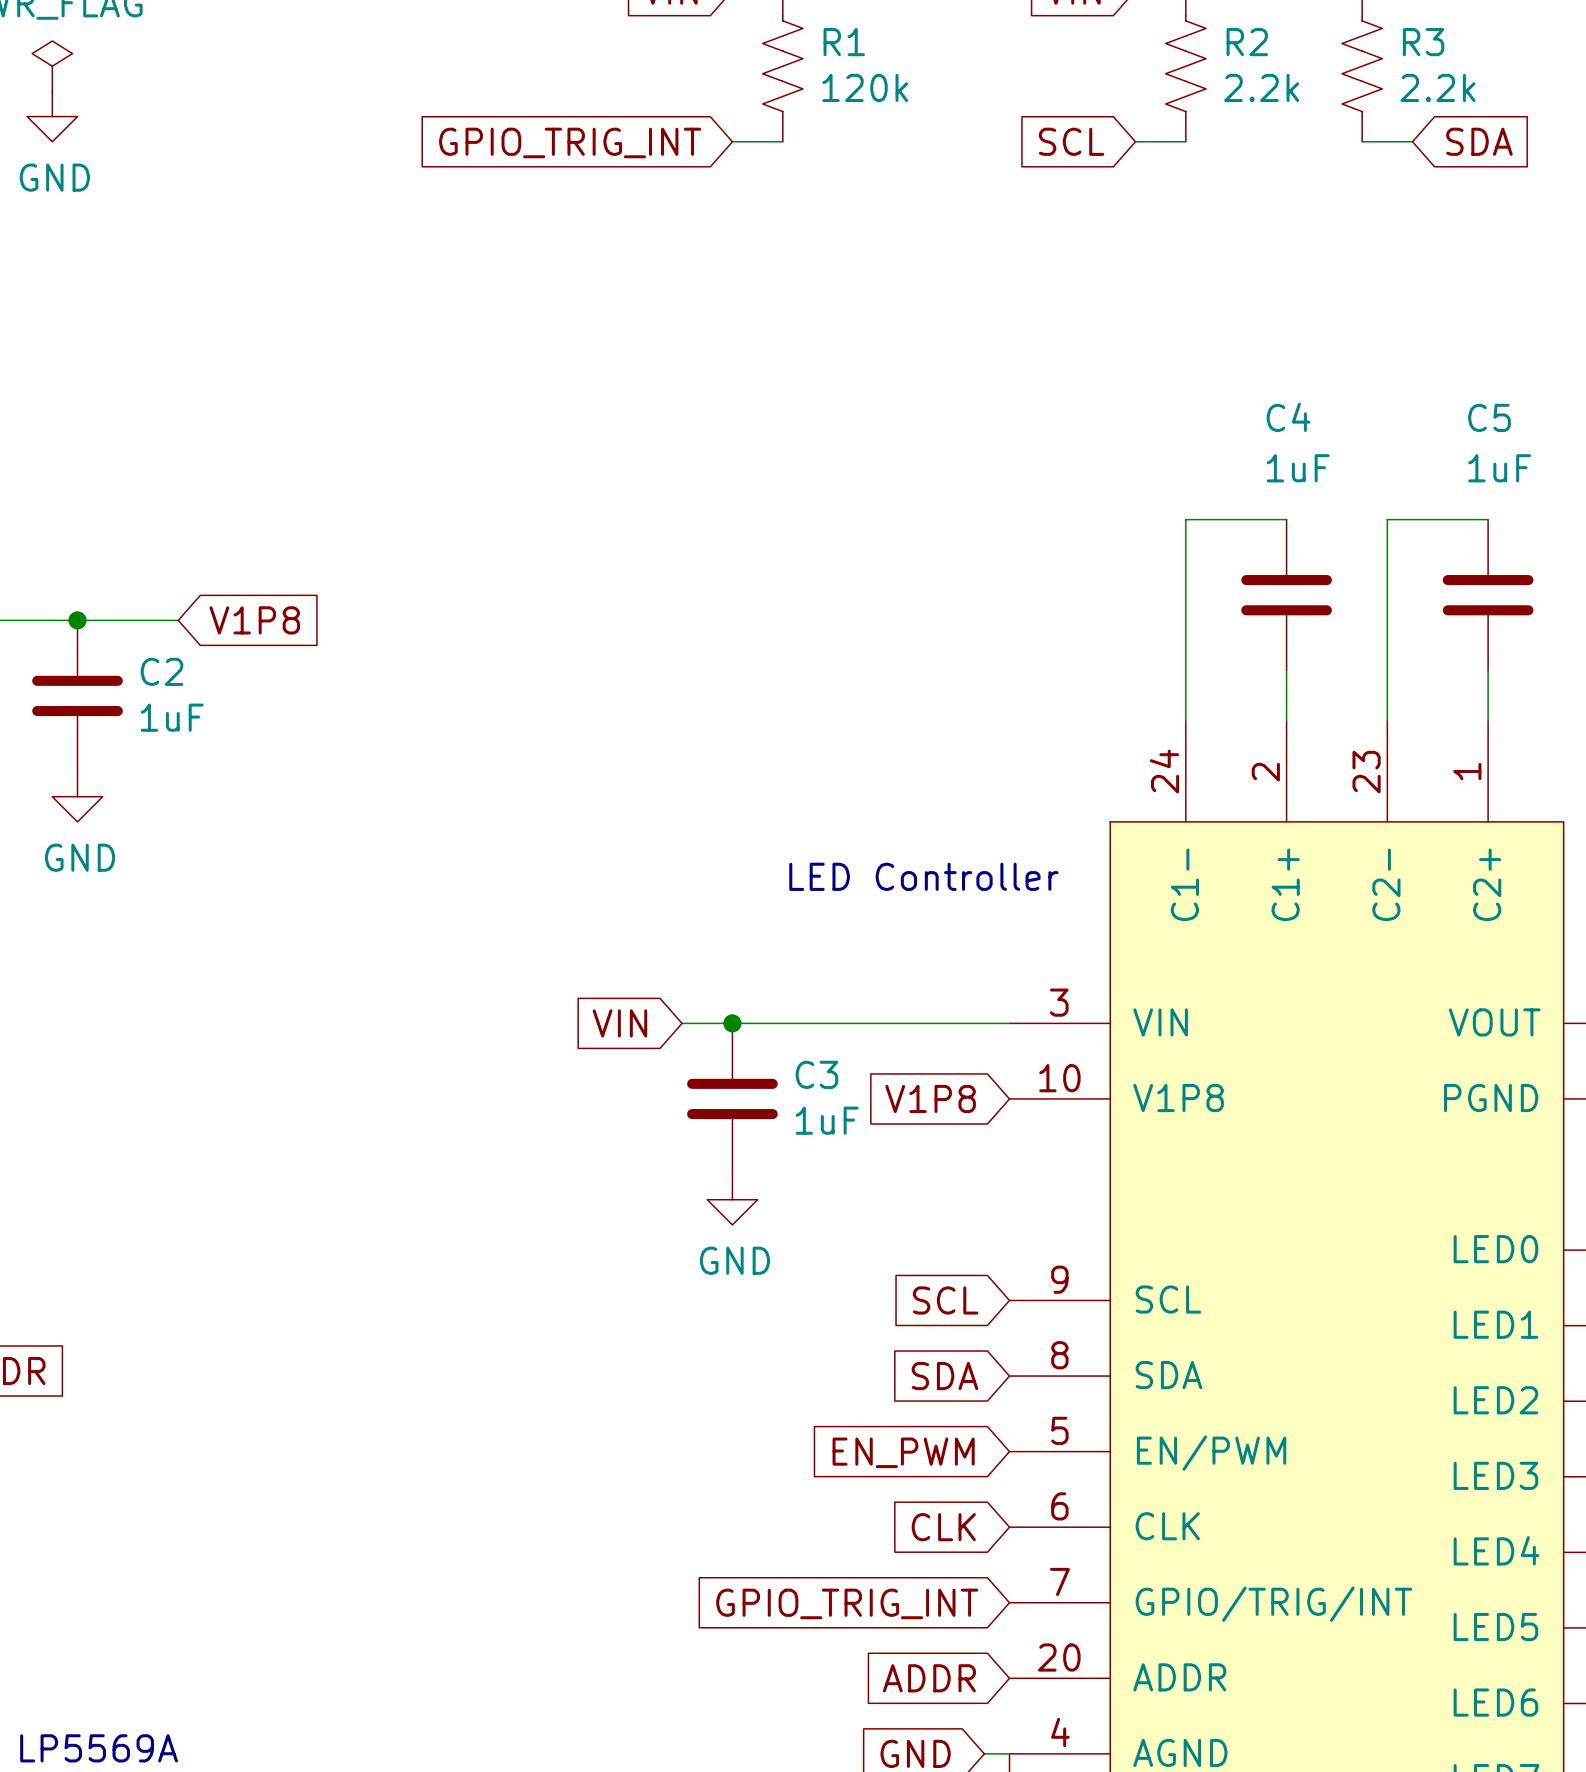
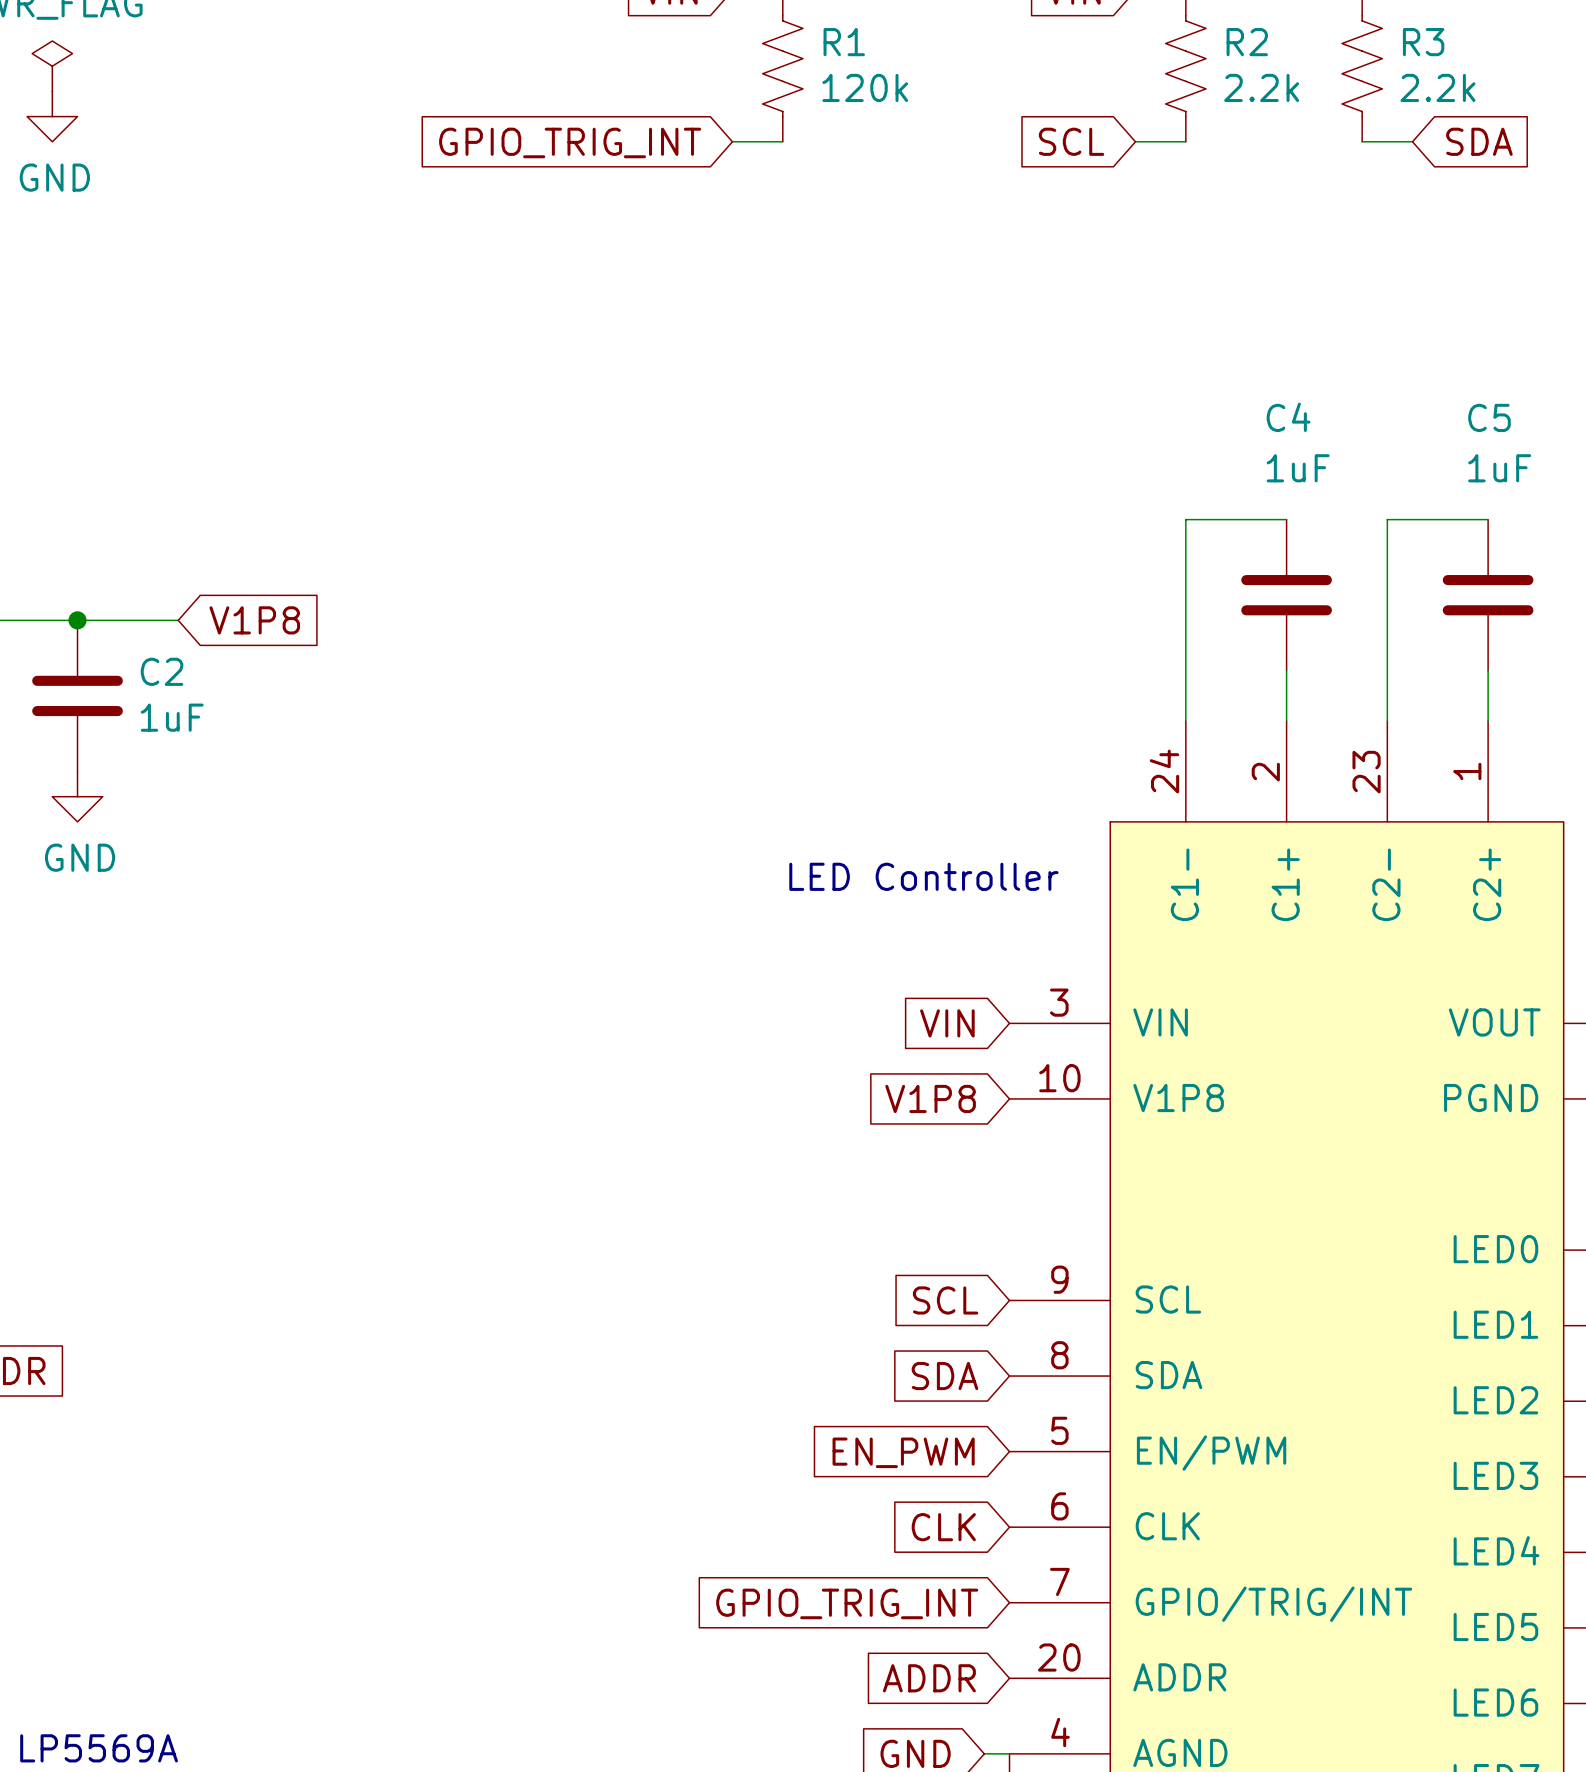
global label position: VIN (619, 1023) -> VIN (947, 1023)
wire: (682, 1023) (1009, 1023) -> none
junction: (732, 1023) -> none
C3: 1uF (732, 1098) -> none
power symbol: GND (732, 1199) -> none

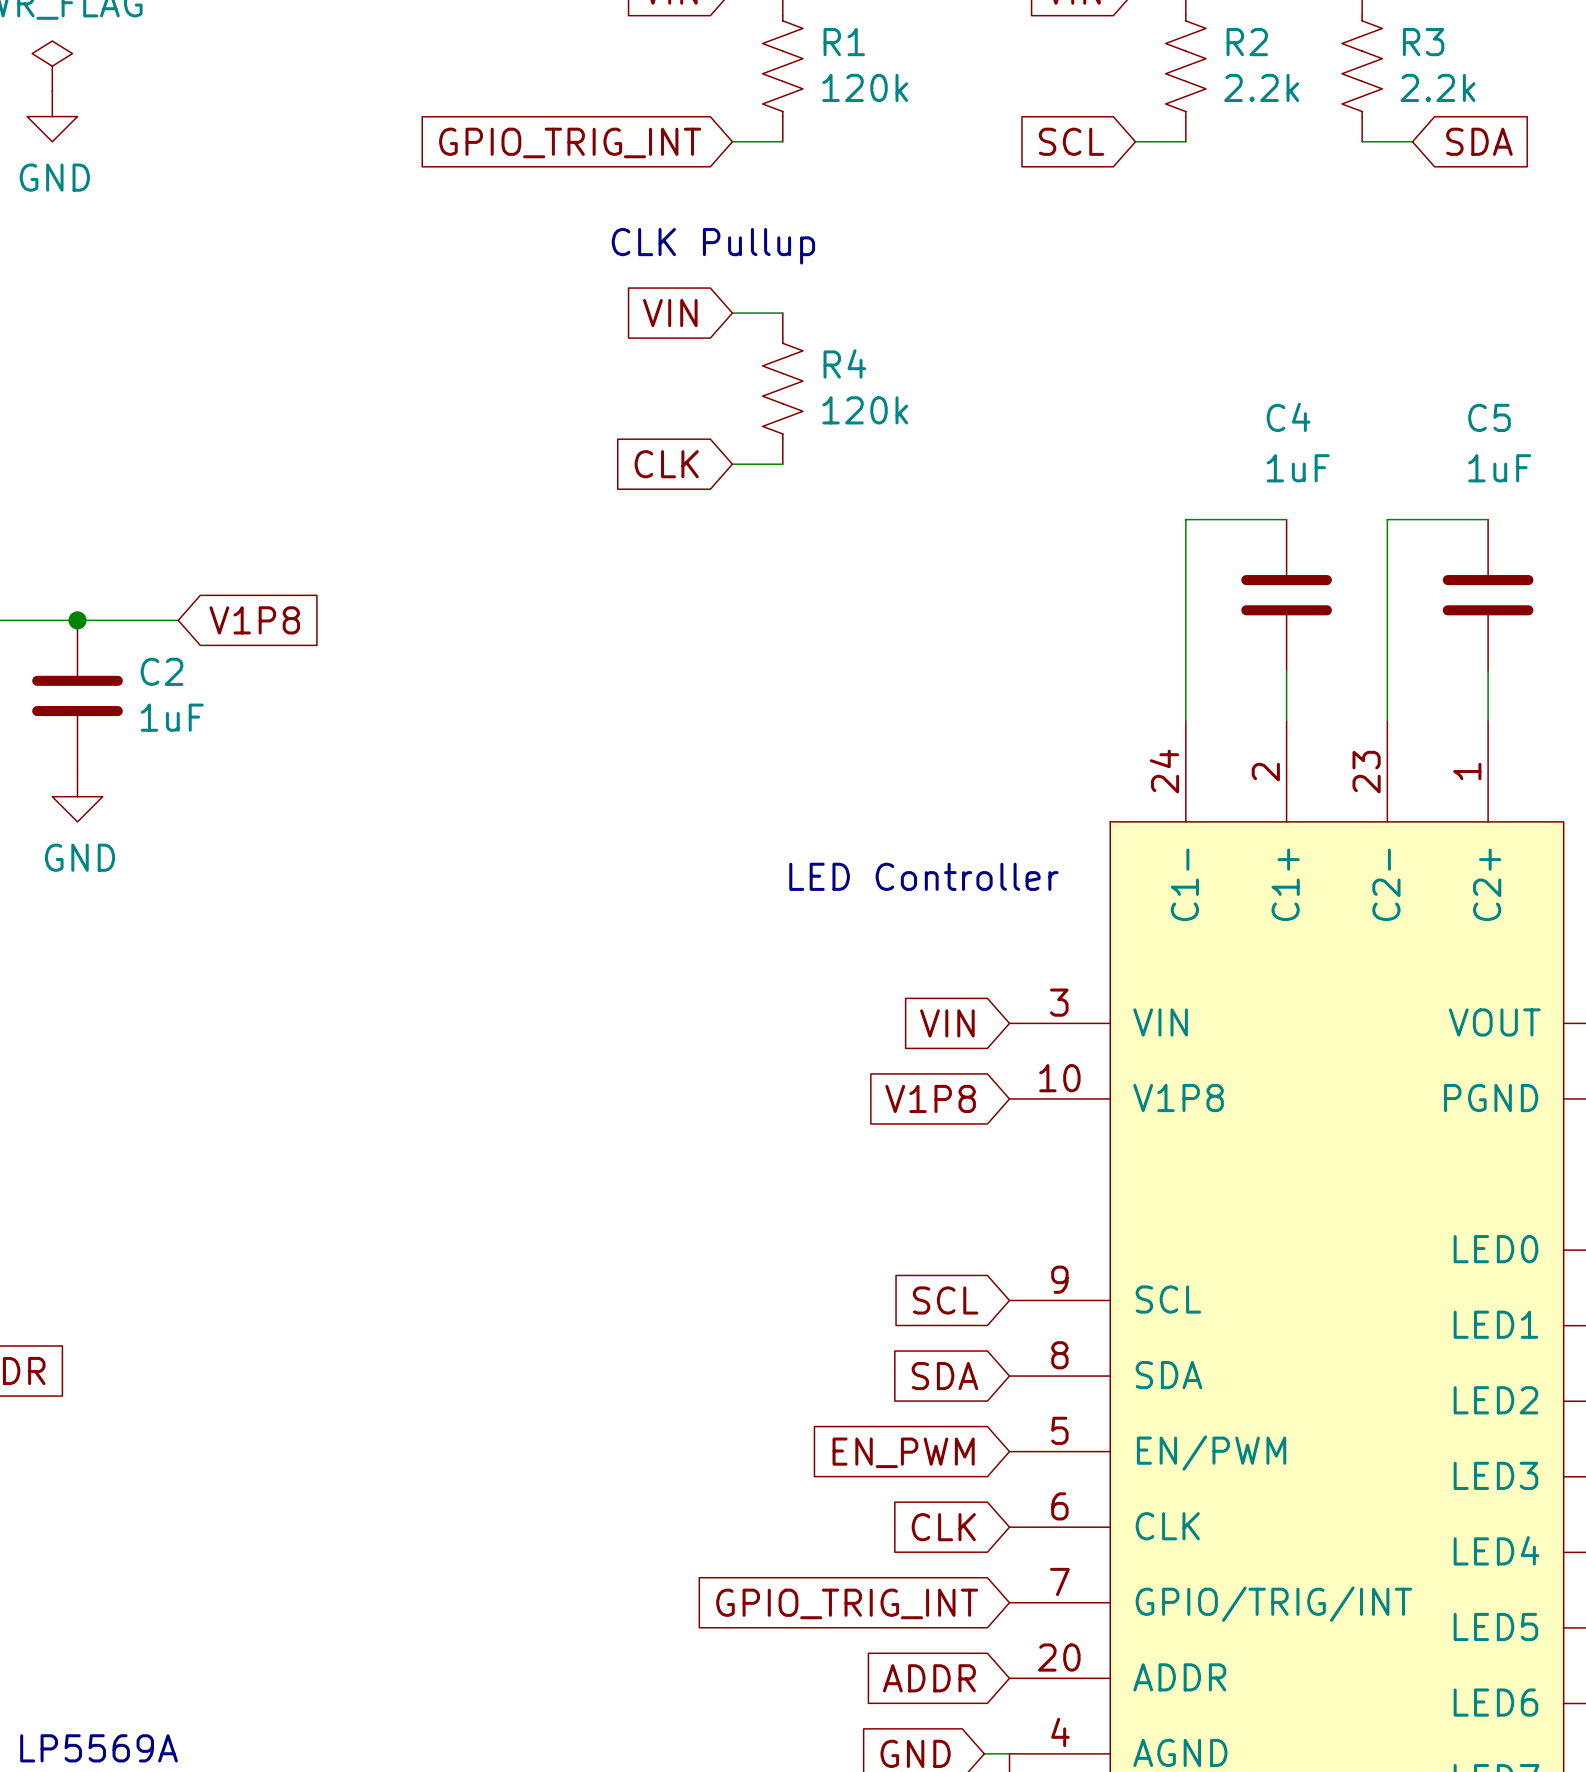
text: none -> CLK Pullup (713, 246)
global label: none -> VIN (670, 313)
wire: none -> (732, 313) (782, 313)
R4: none -> 120k (782, 388)
global label: none -> CLK (666, 464)
wire: none -> (732, 464) (782, 464)

